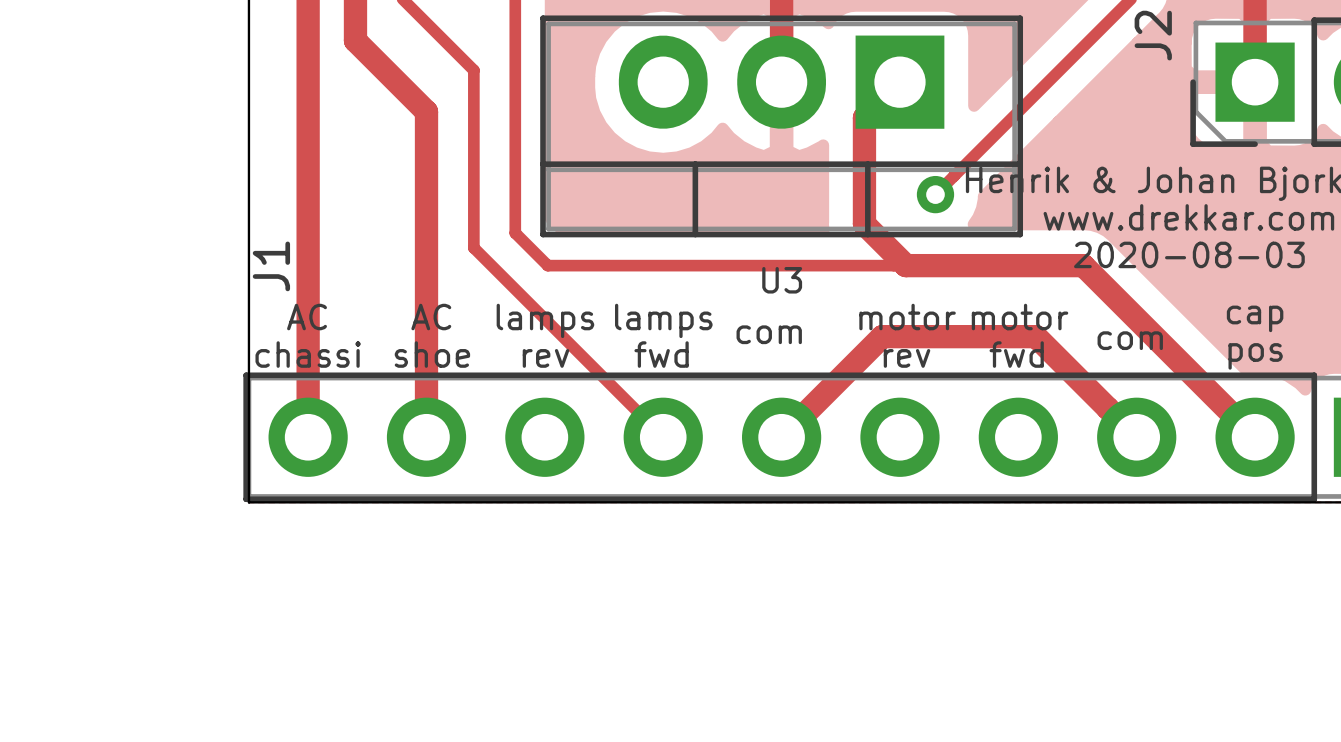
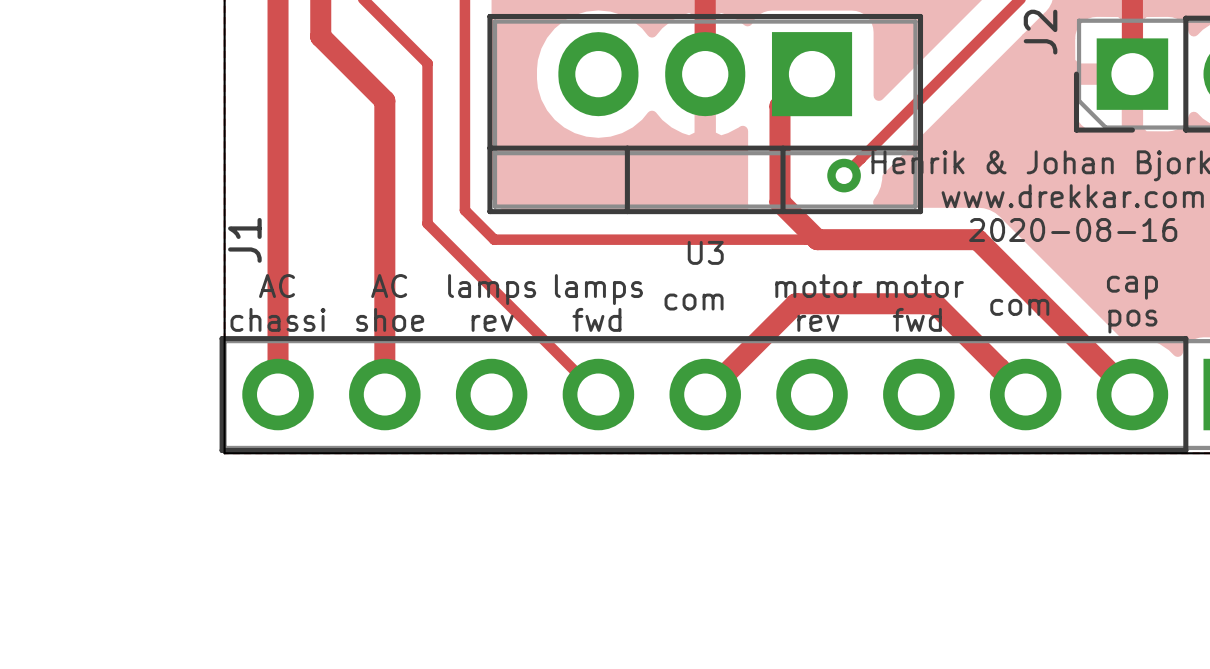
text: 2020-08-03 (1189, 254) -> 2020-08-16 (1073, 230)

